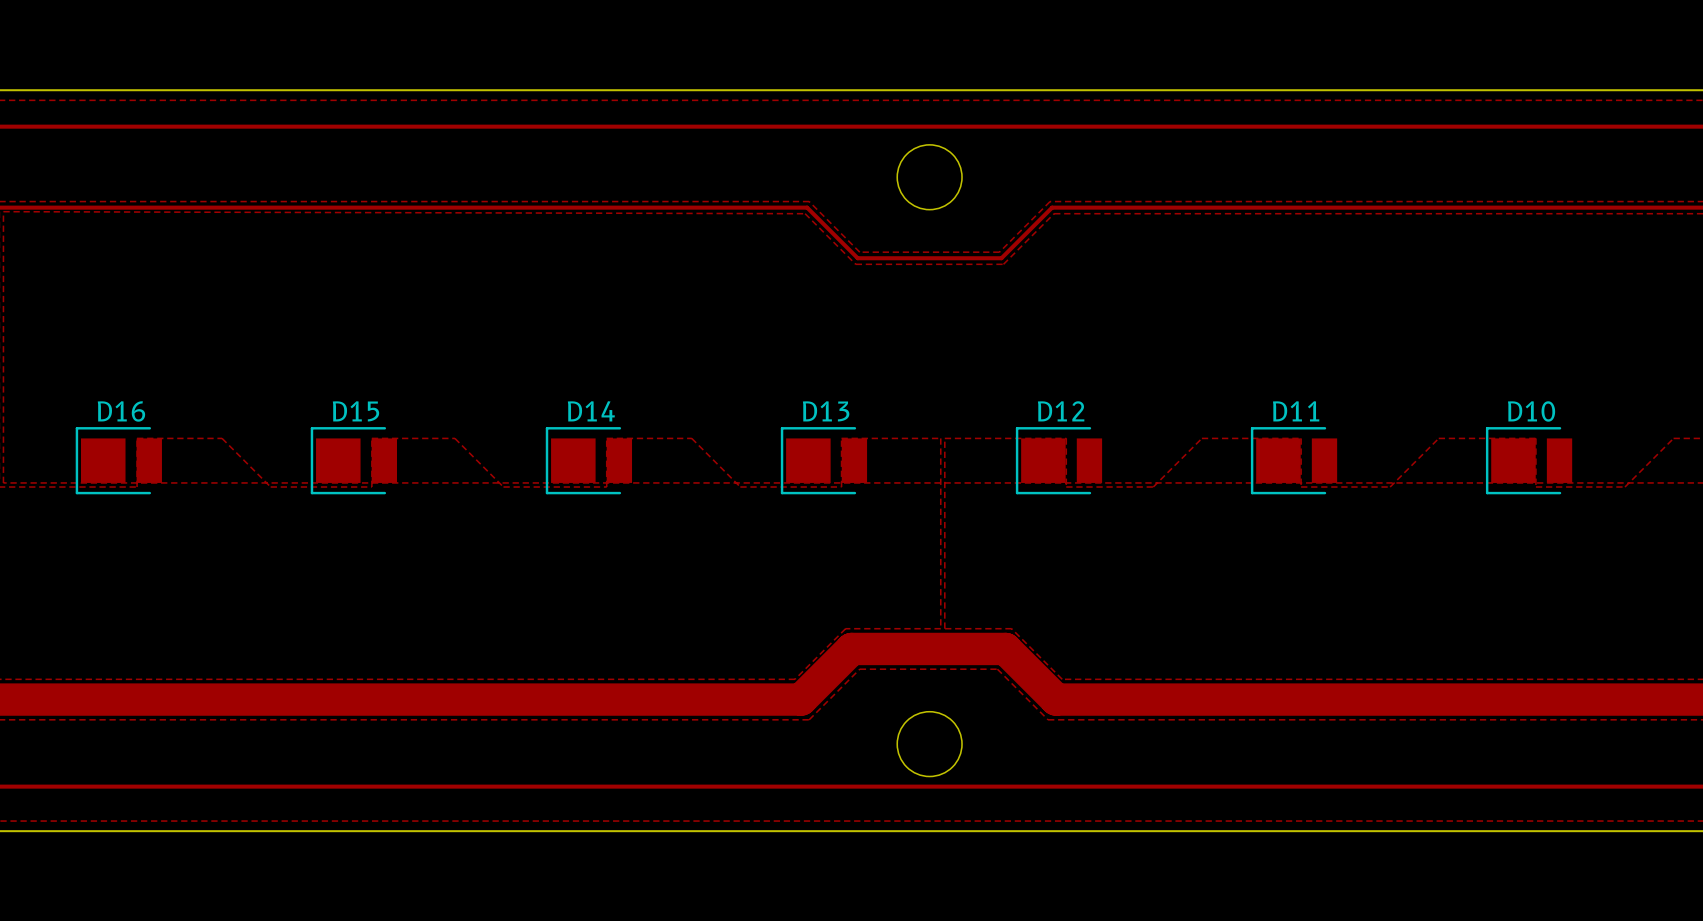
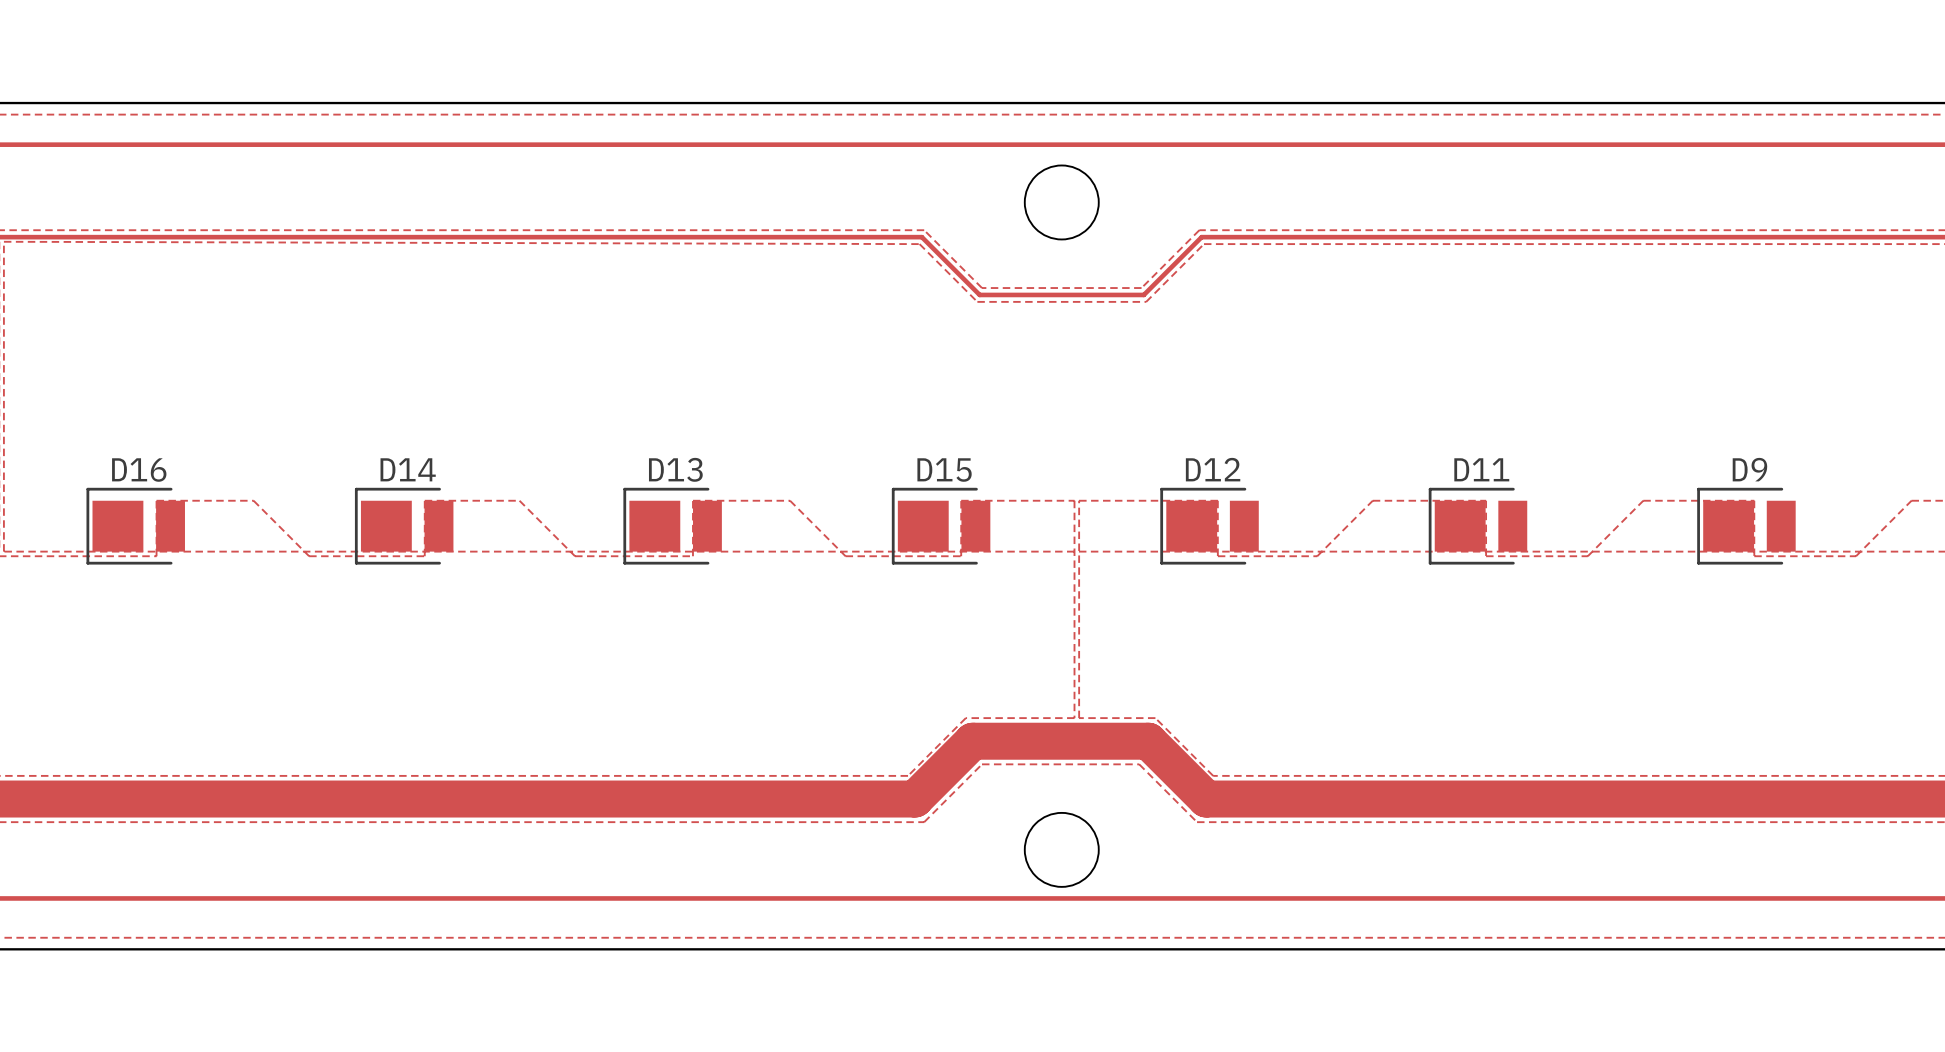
D15 name: D15 (355, 411) -> D14 (408, 469)
D14 name: D14 (591, 411) -> D13 (675, 469)
D13 name: D13 (826, 411) -> D15 (944, 470)
D10 name: D10 (1531, 411) -> D9 (1749, 469)

